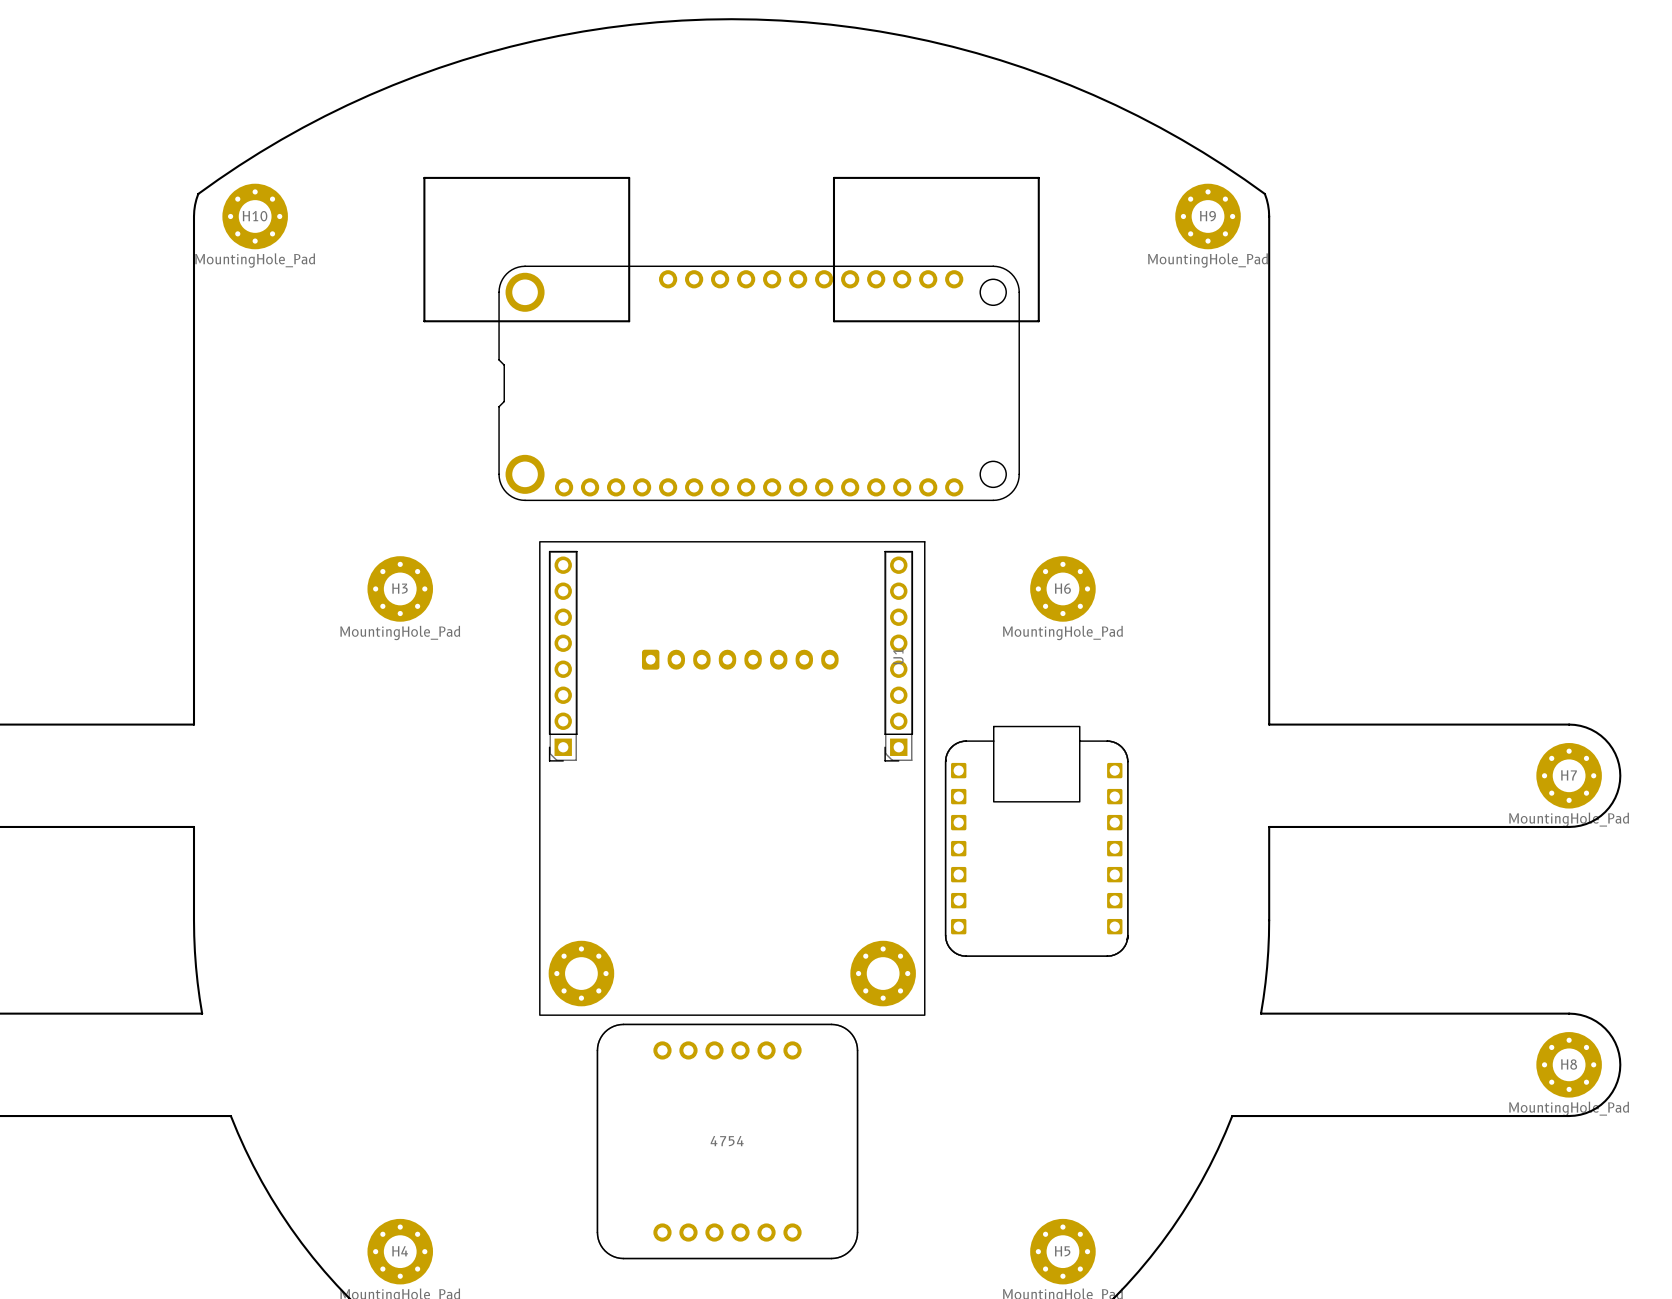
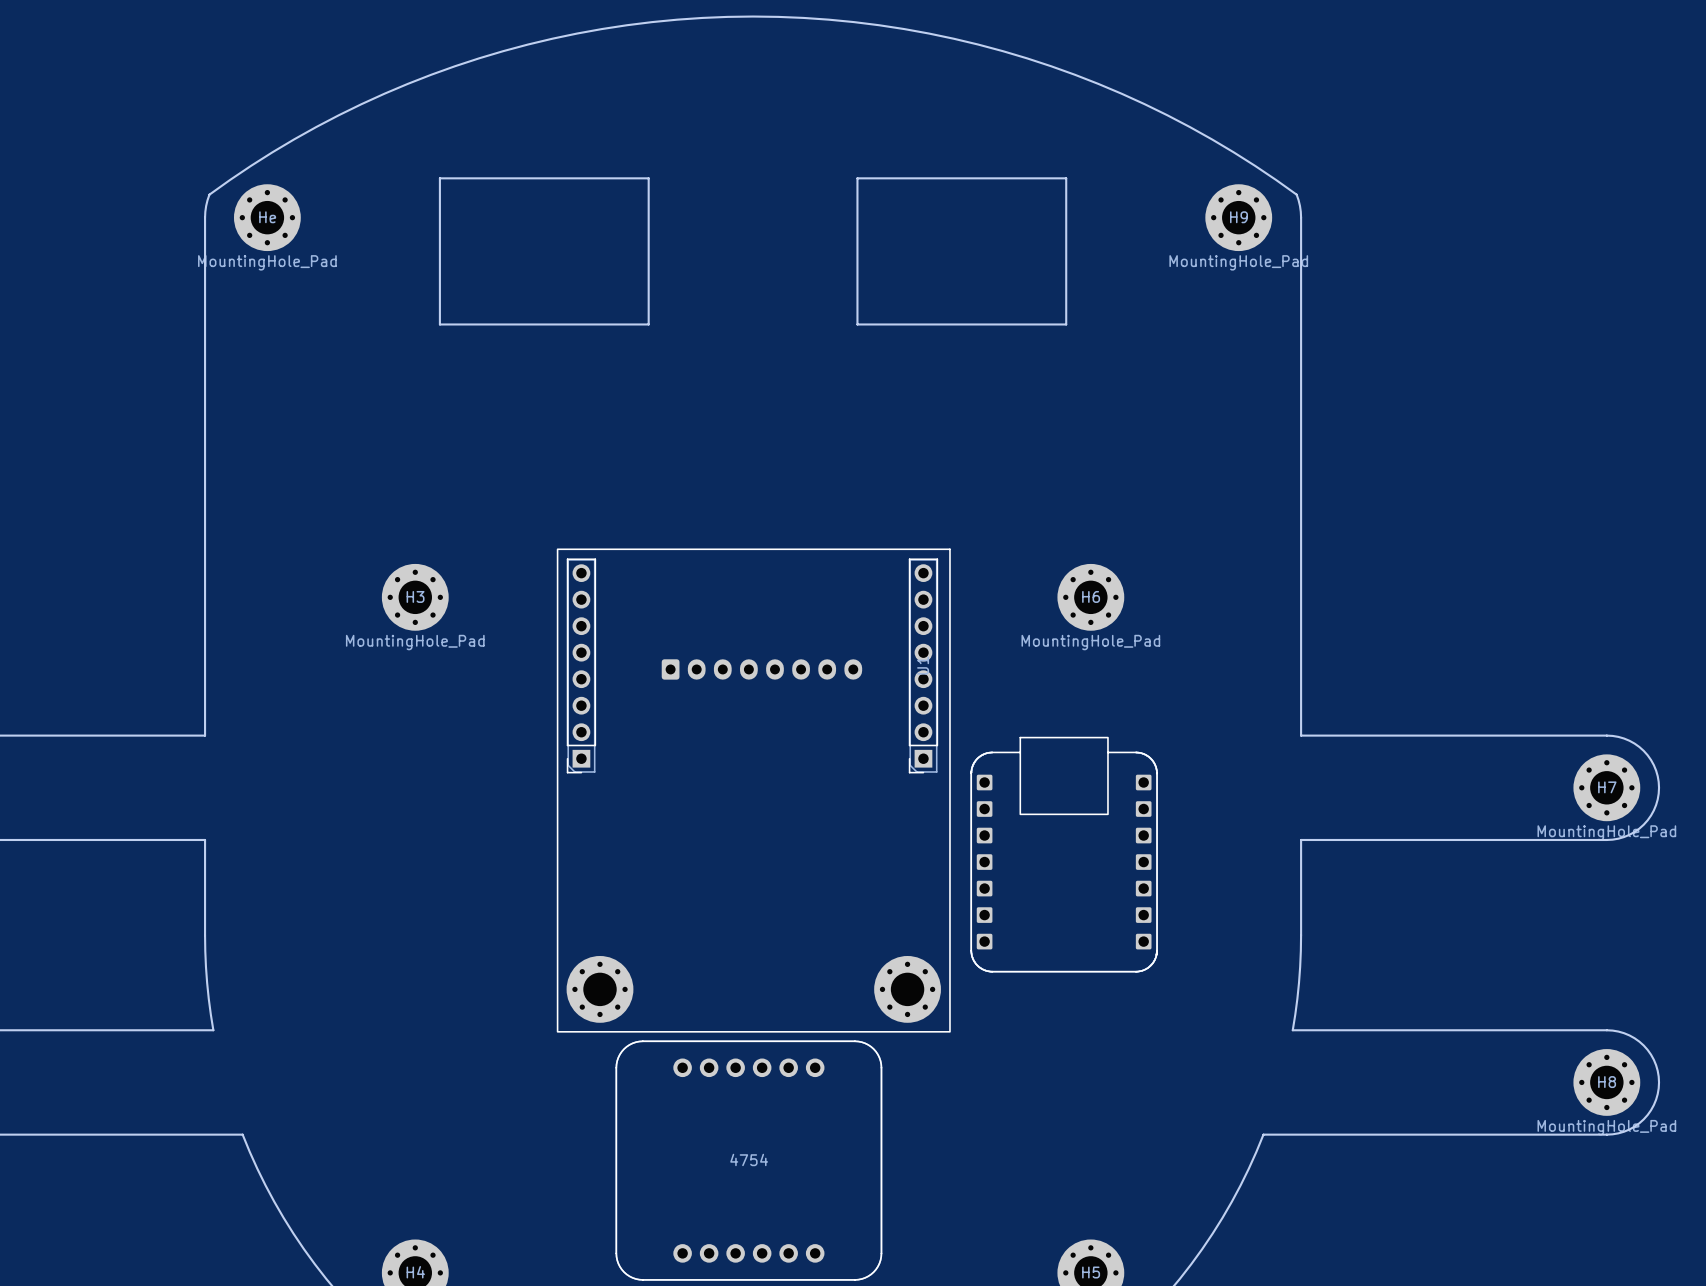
H10 name: H10 (255, 216) -> He (267, 217)
part: (759, 383) -> none

